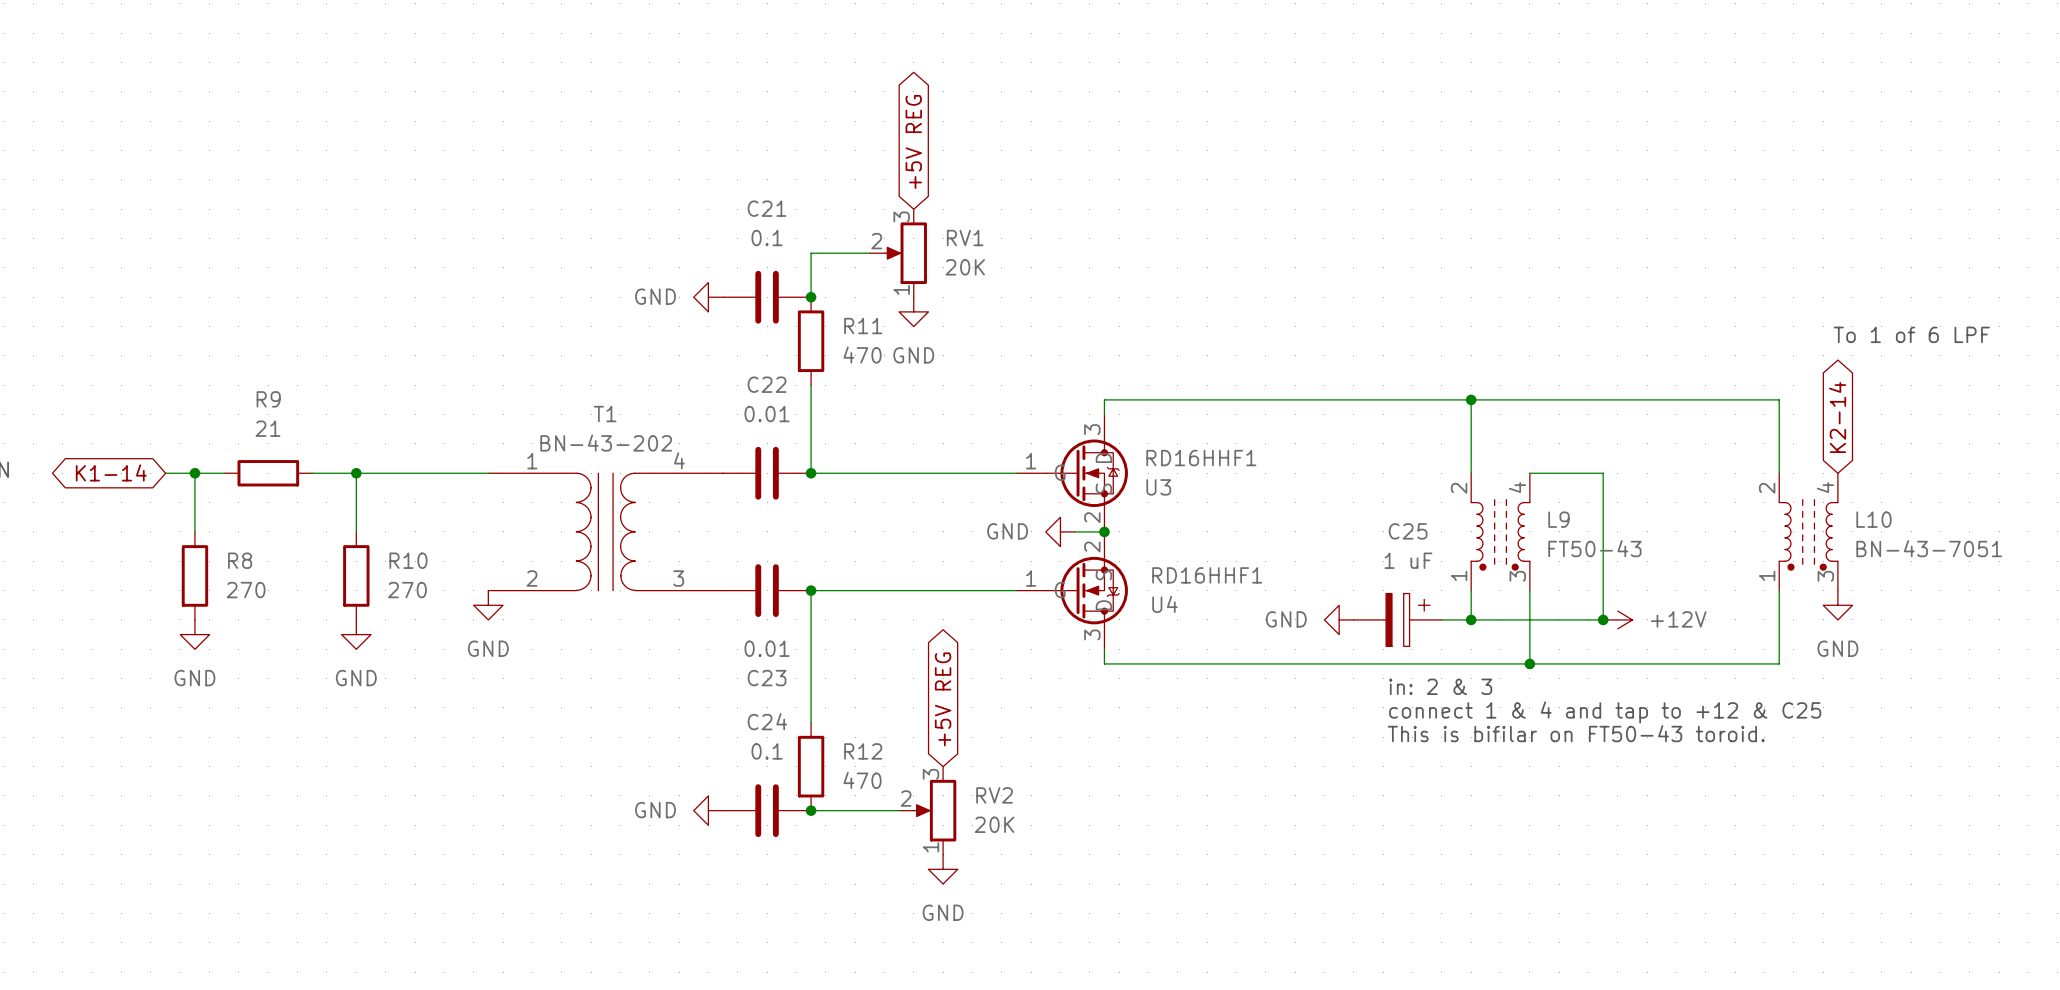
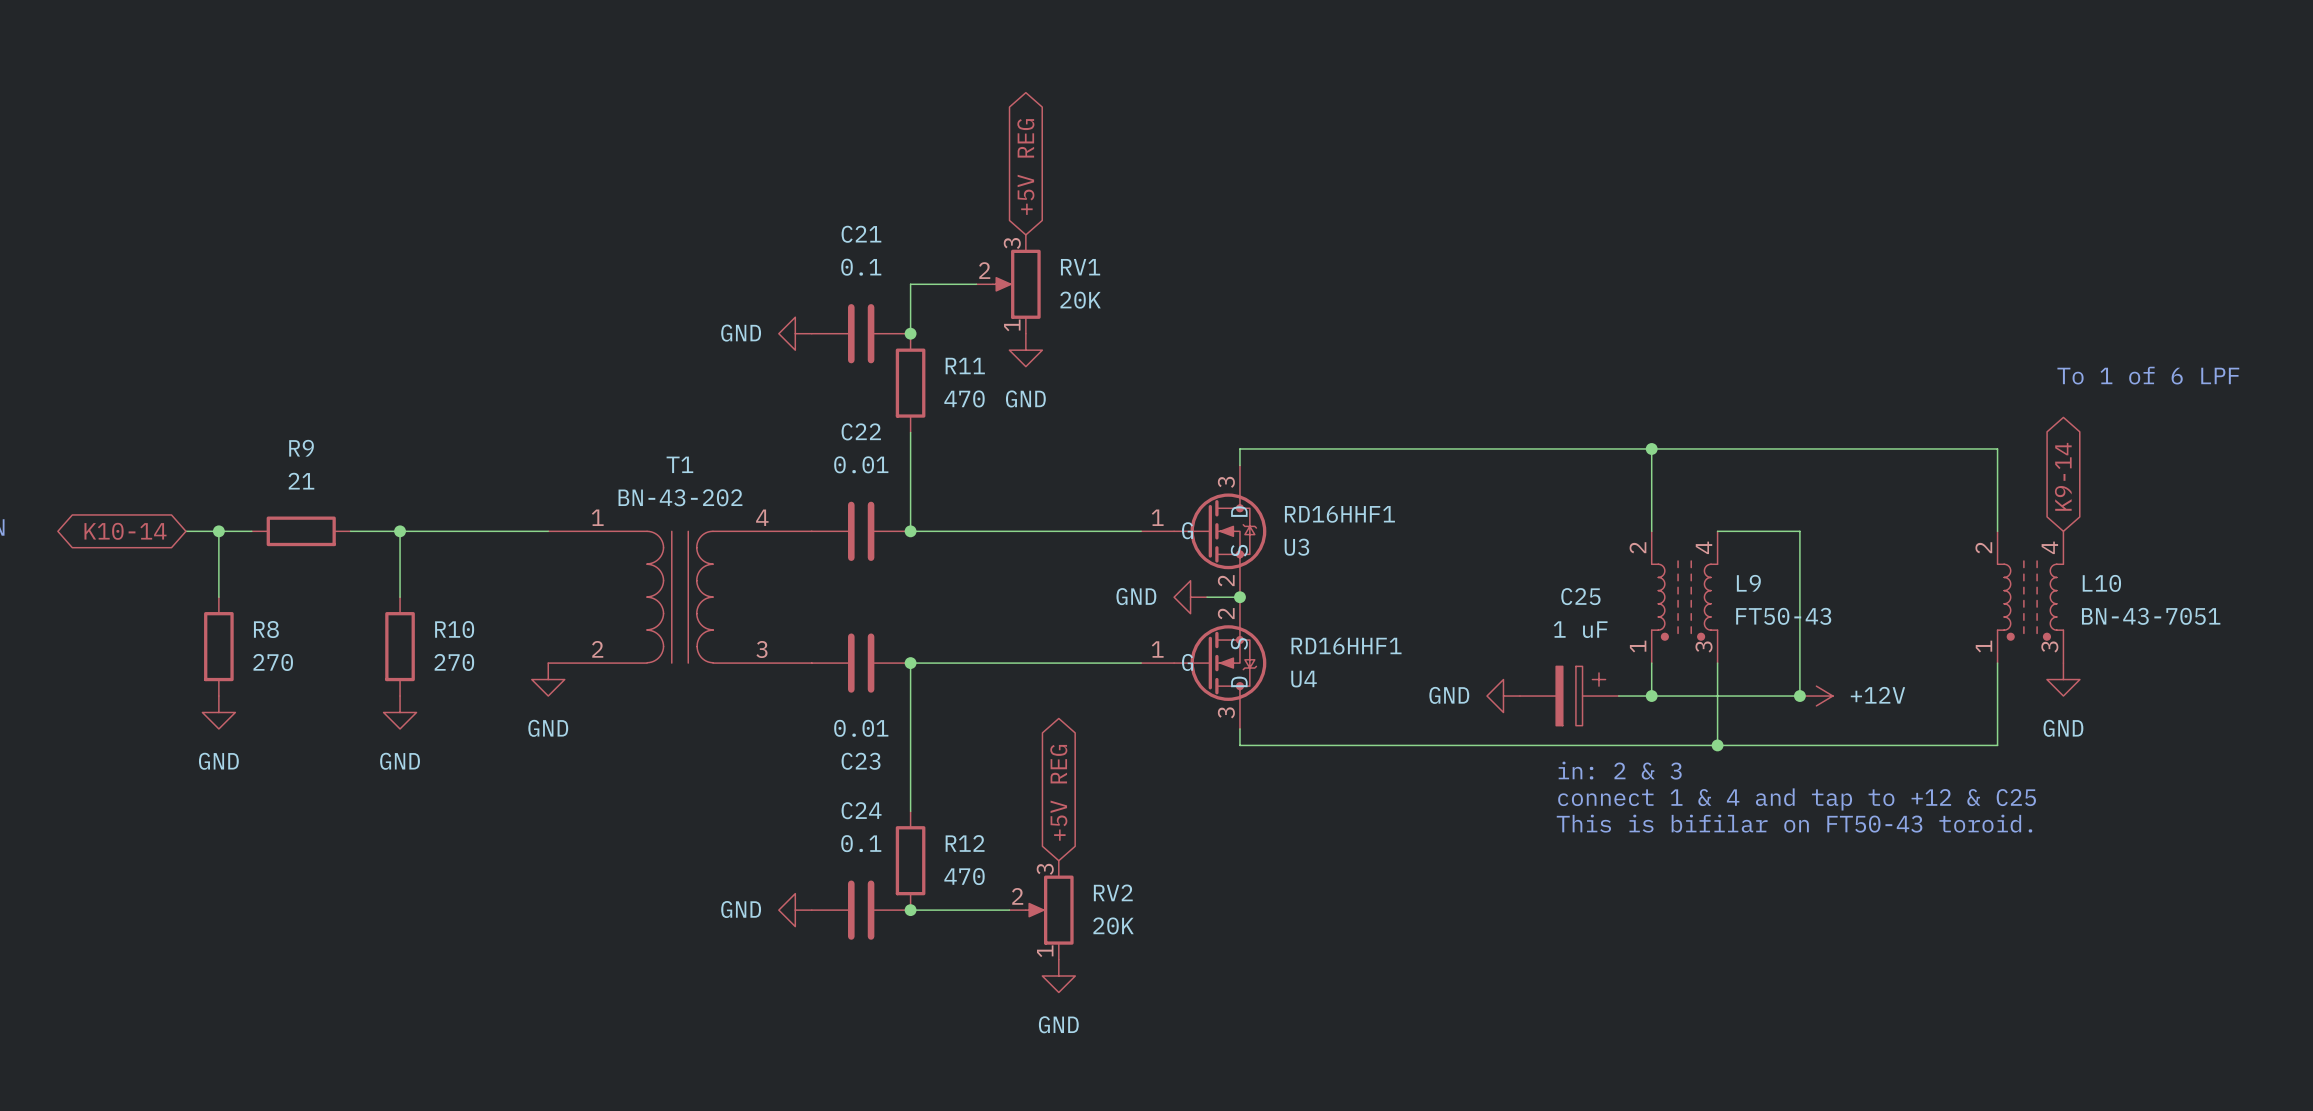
global label: K2-14 (1837, 417) -> K9-14 (2063, 476)
global label: K1-14 (111, 472) -> K10-14 (125, 531)

